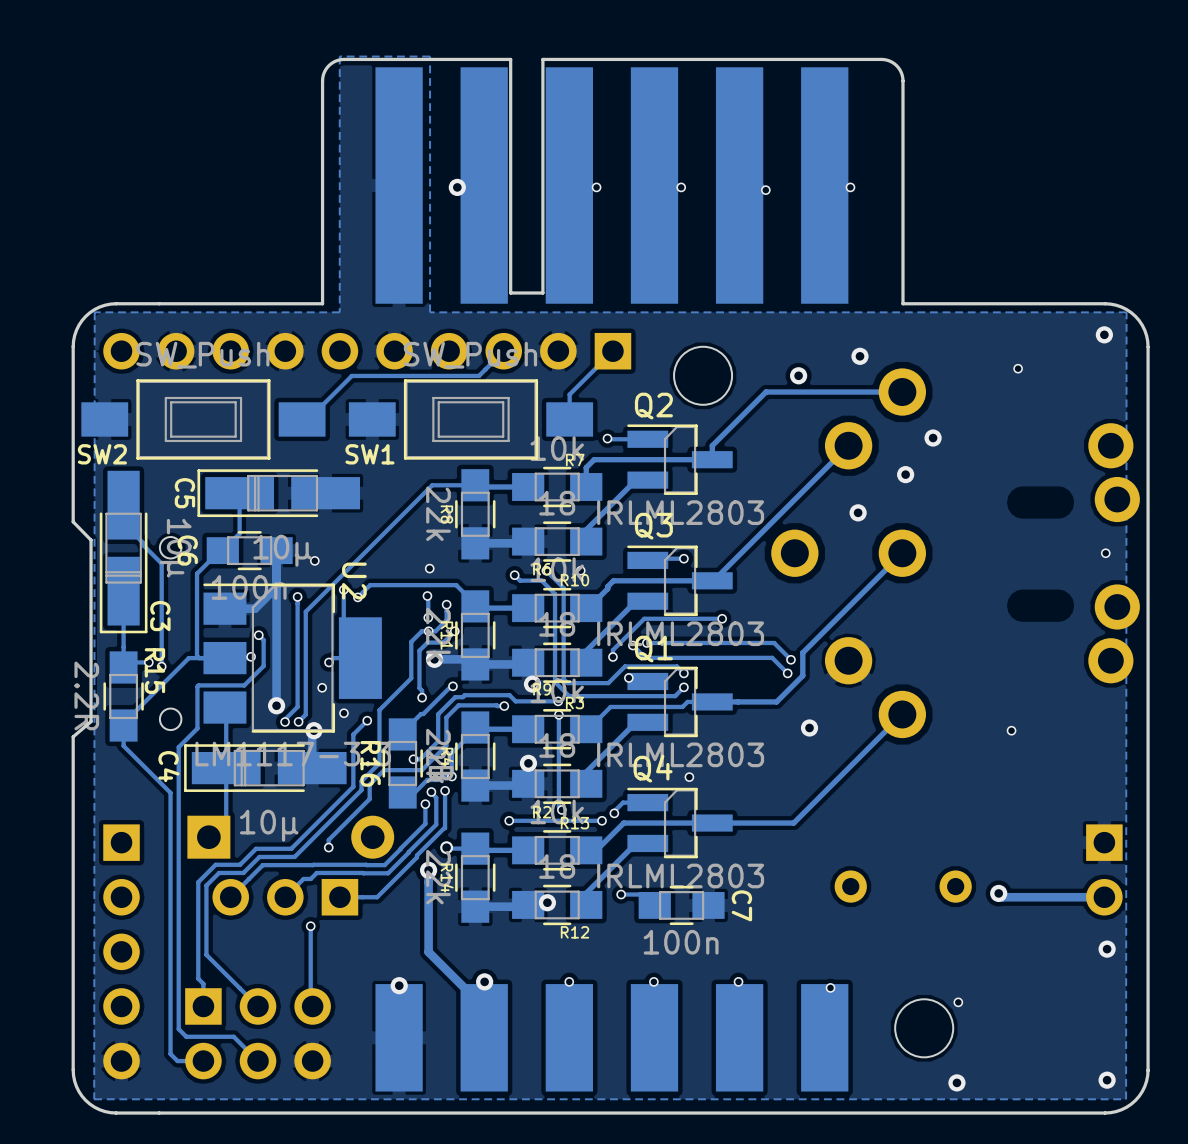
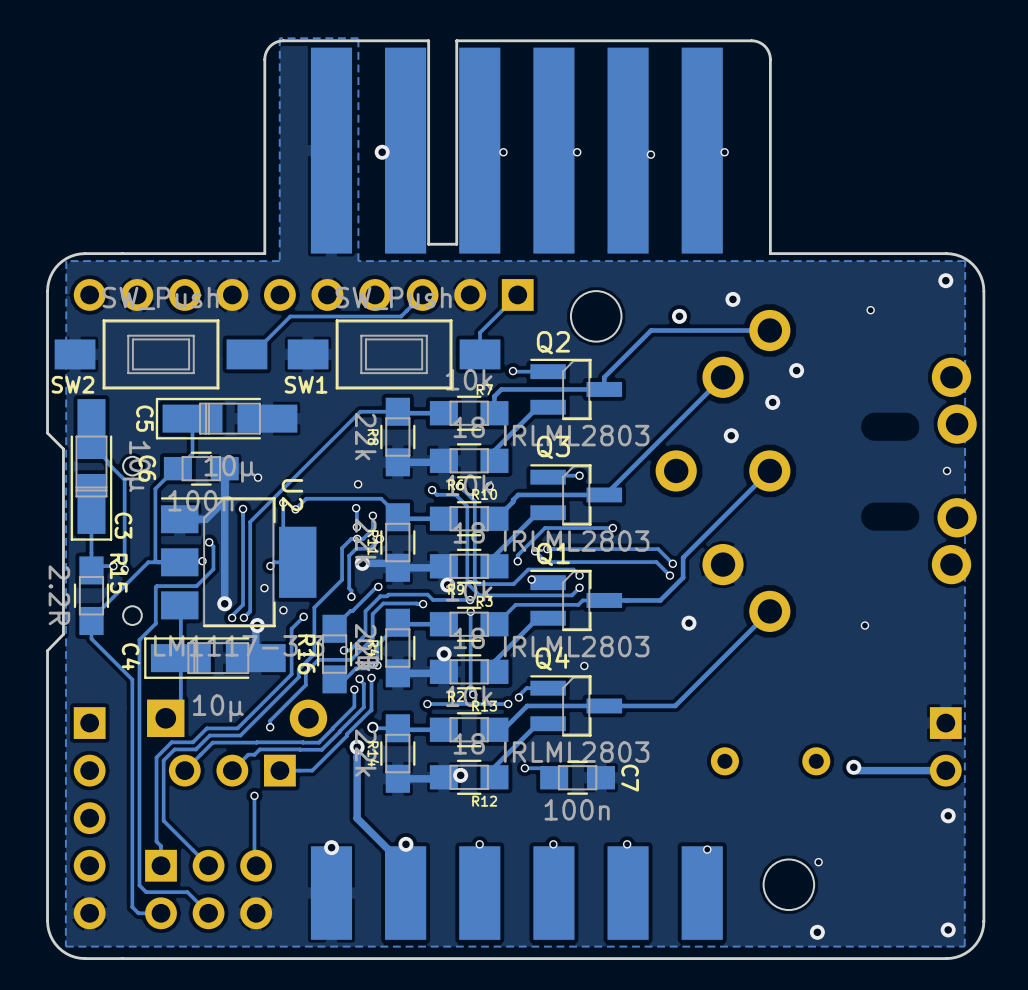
board edge: (73, 509) (73, 521) (91, 540) (91, 721) (73, 736) (73, 759) -> (47, 433) (63, 448) (63, 634) (47, 650)

